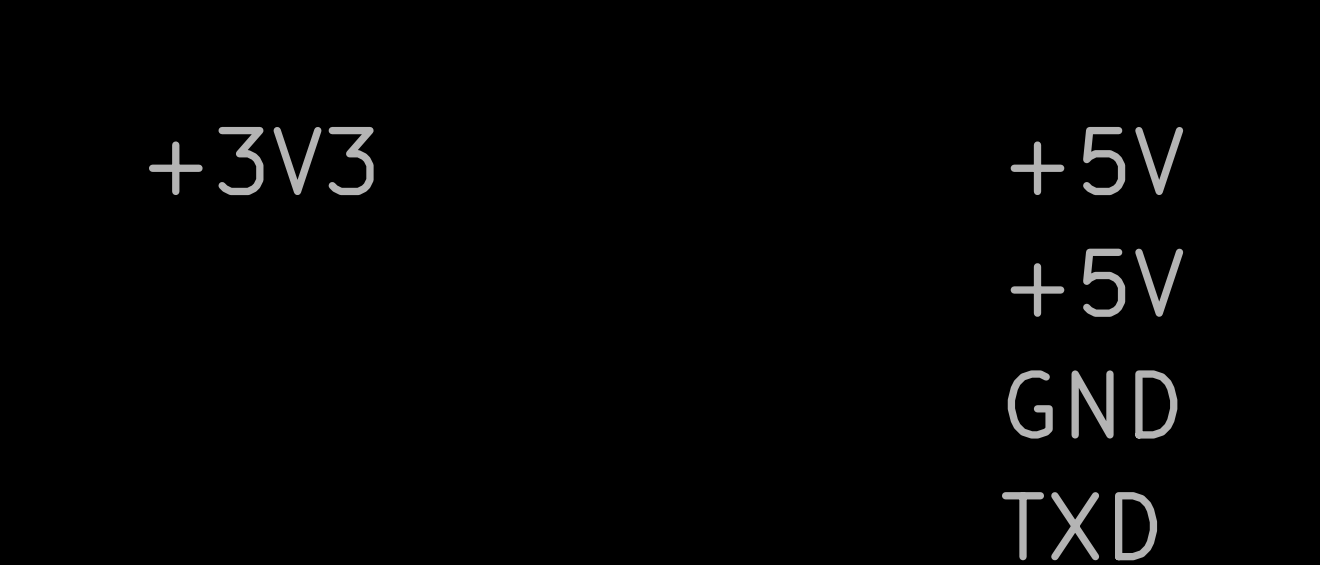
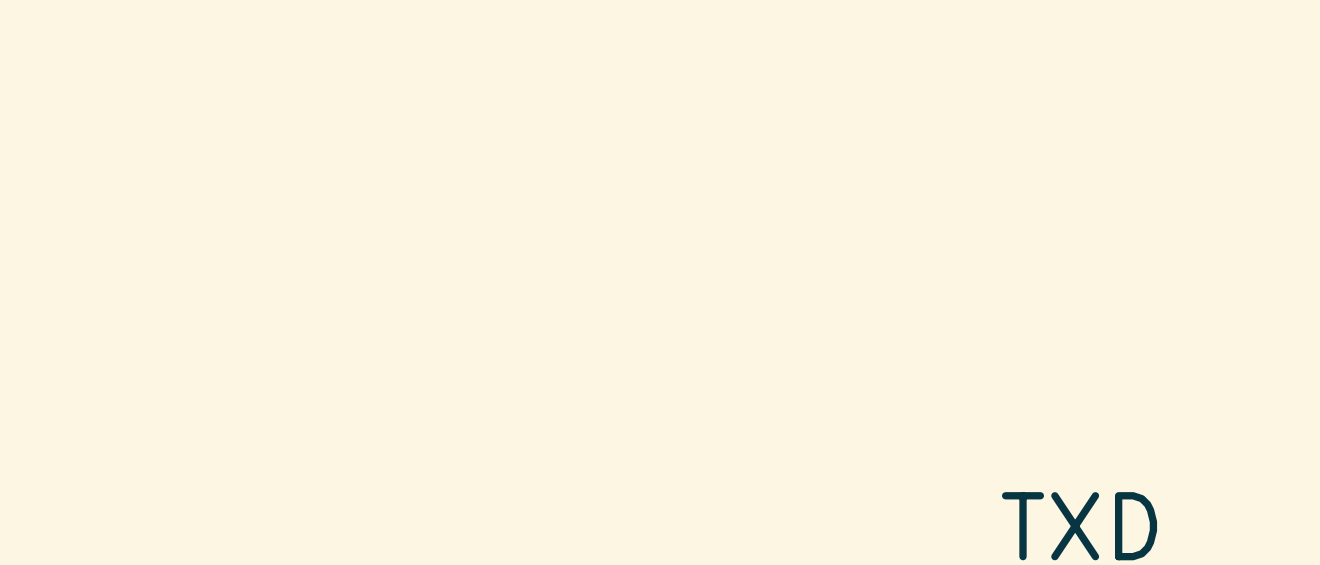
label: +3V3 (261, 161) -> none
label: +5V (1096, 161) -> none
label: +5V (1096, 282) -> none
label: GND (1092, 404) -> none

